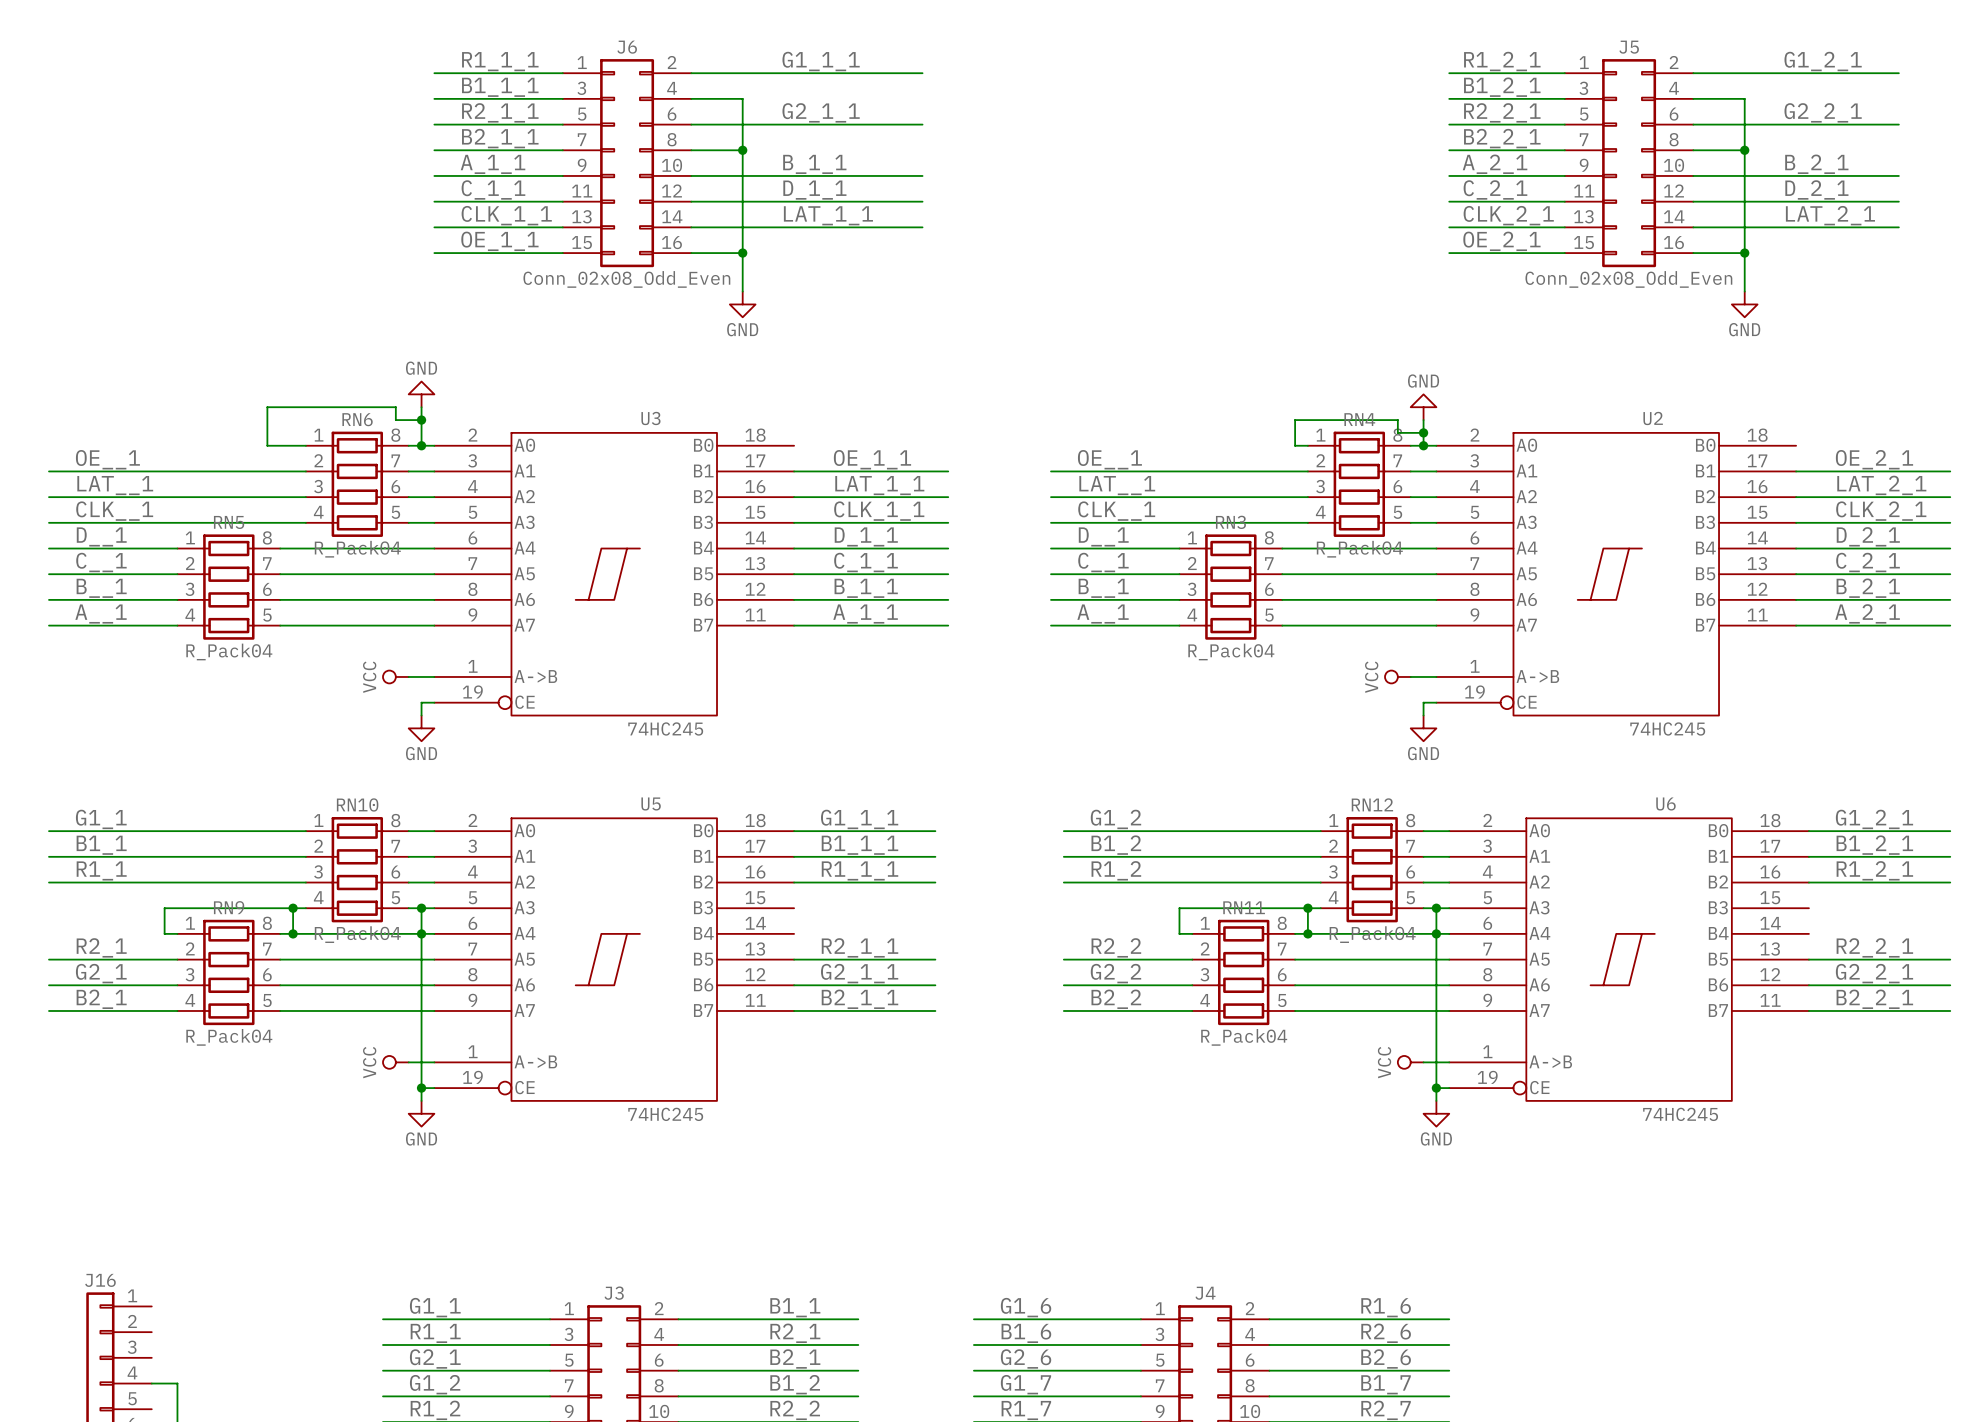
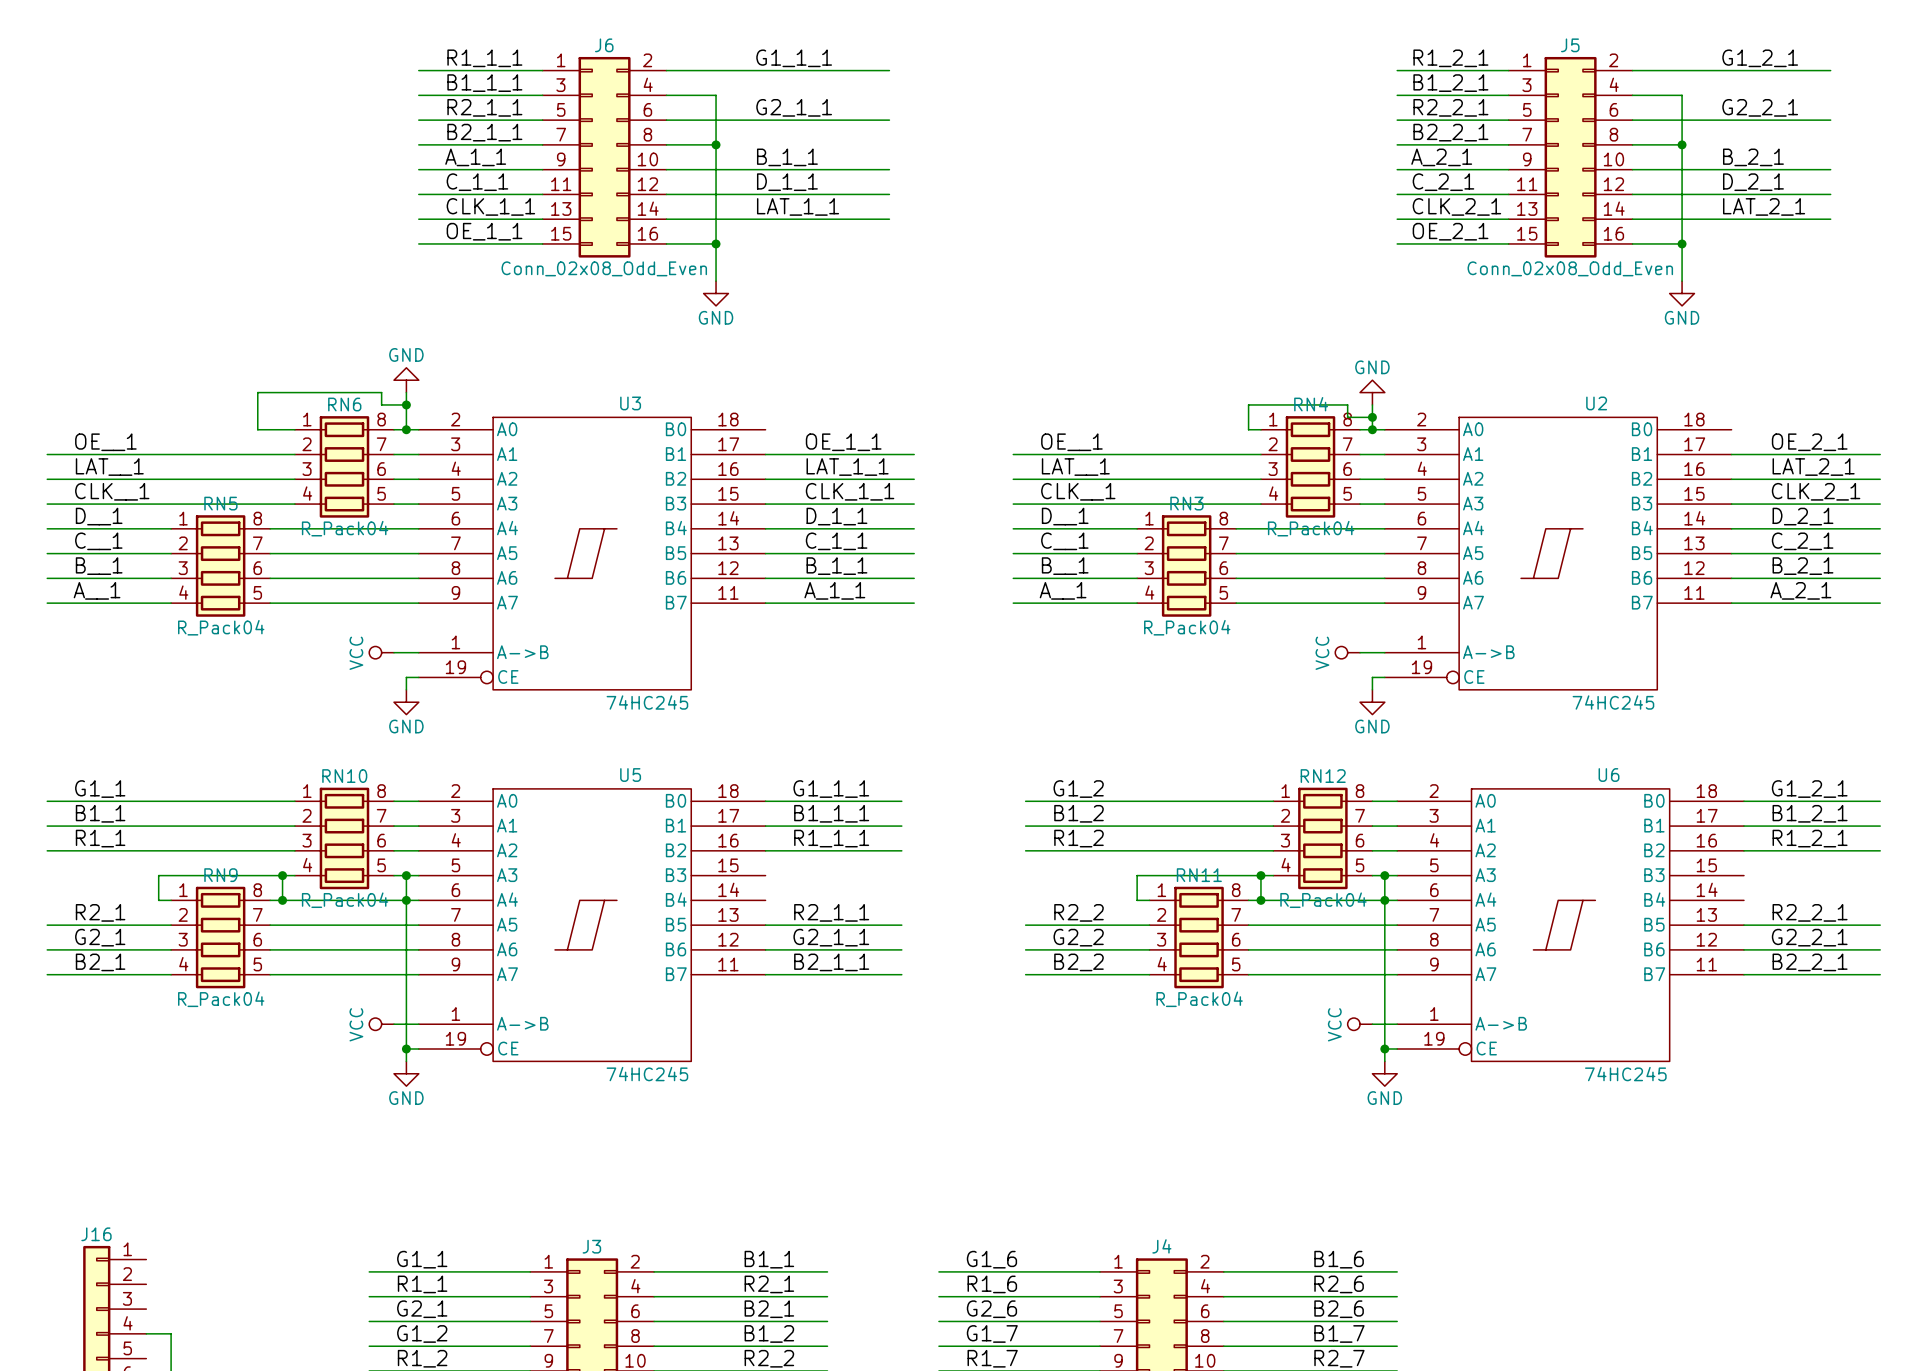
label: R1_6 (1386, 1307) -> B1_6 (1339, 1259)
label: B1_6 (1026, 1333) -> R1_6 (992, 1284)

